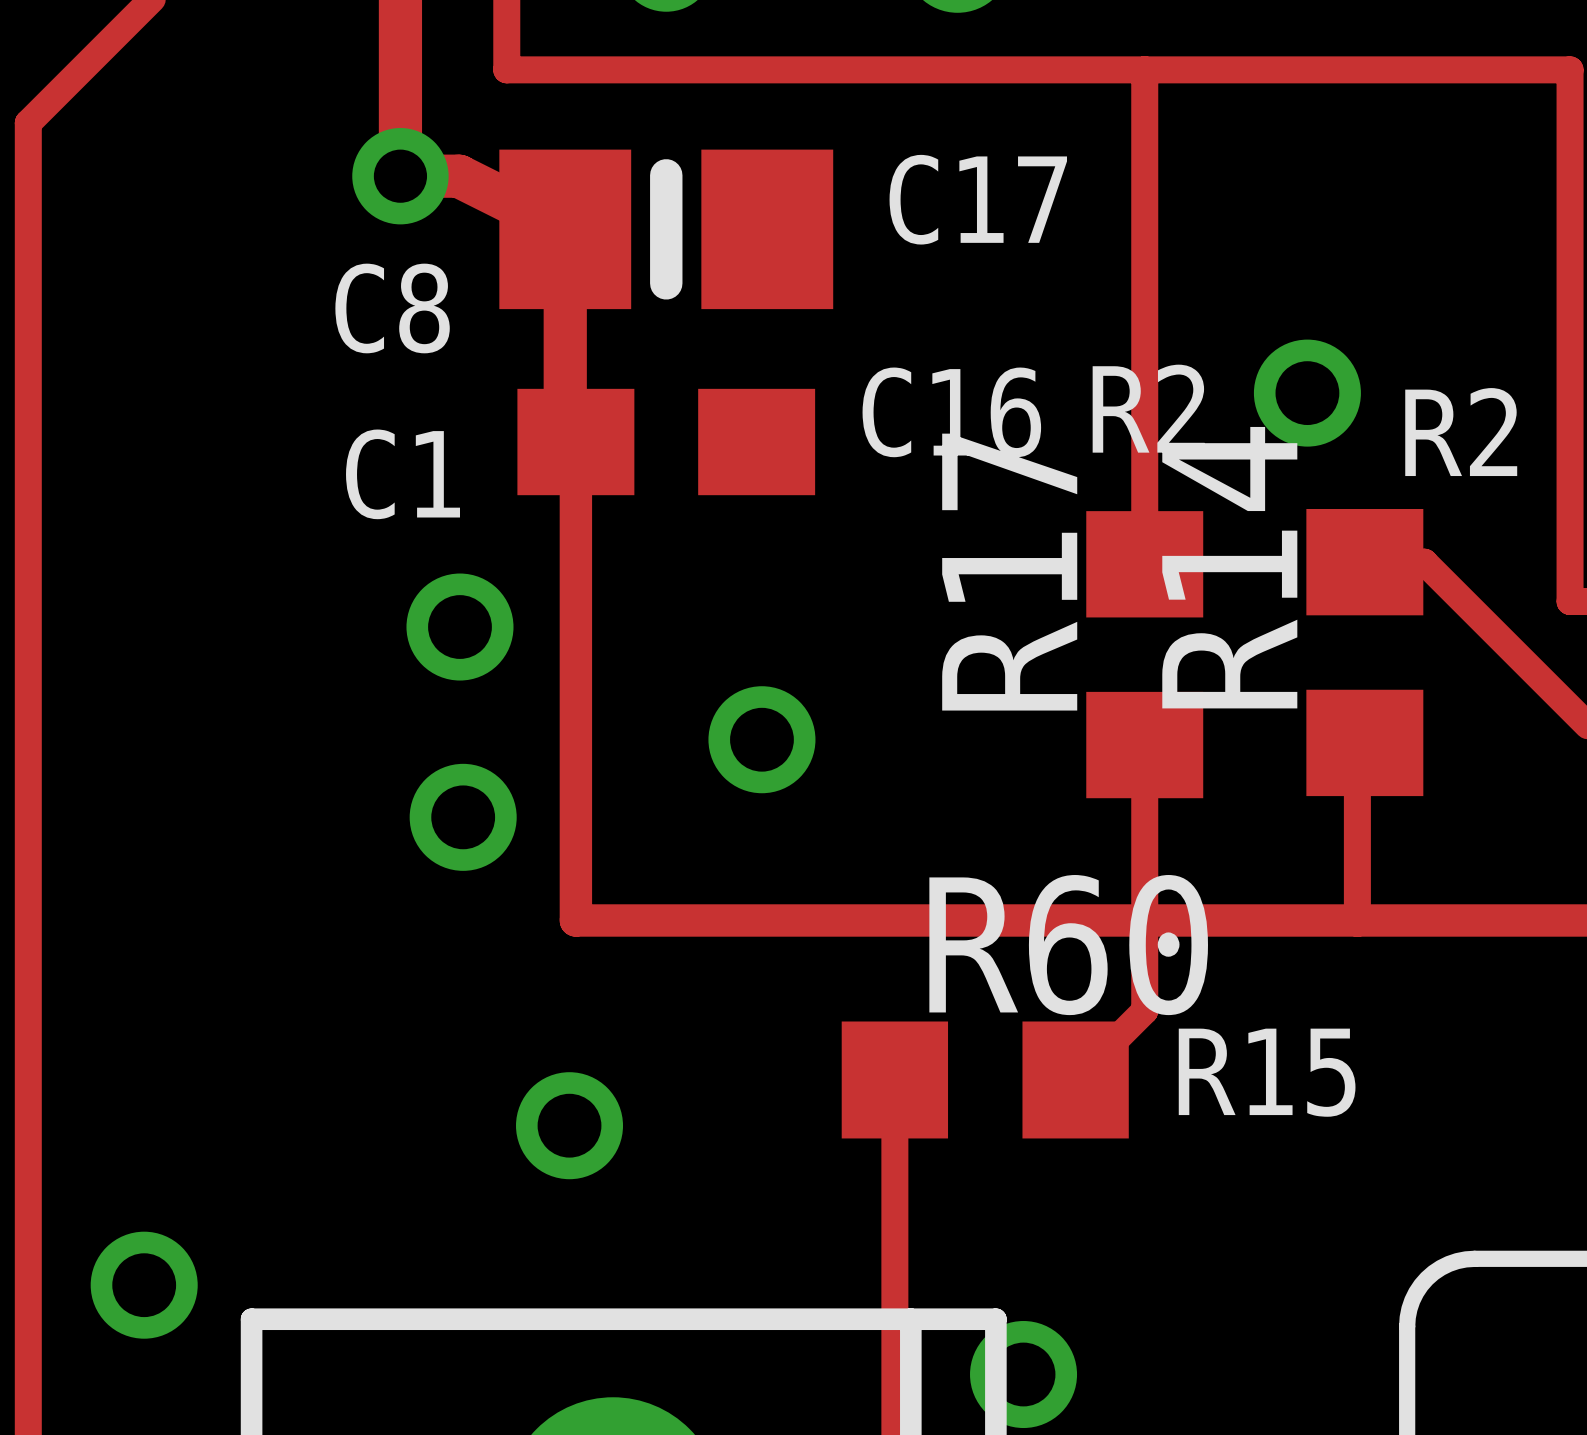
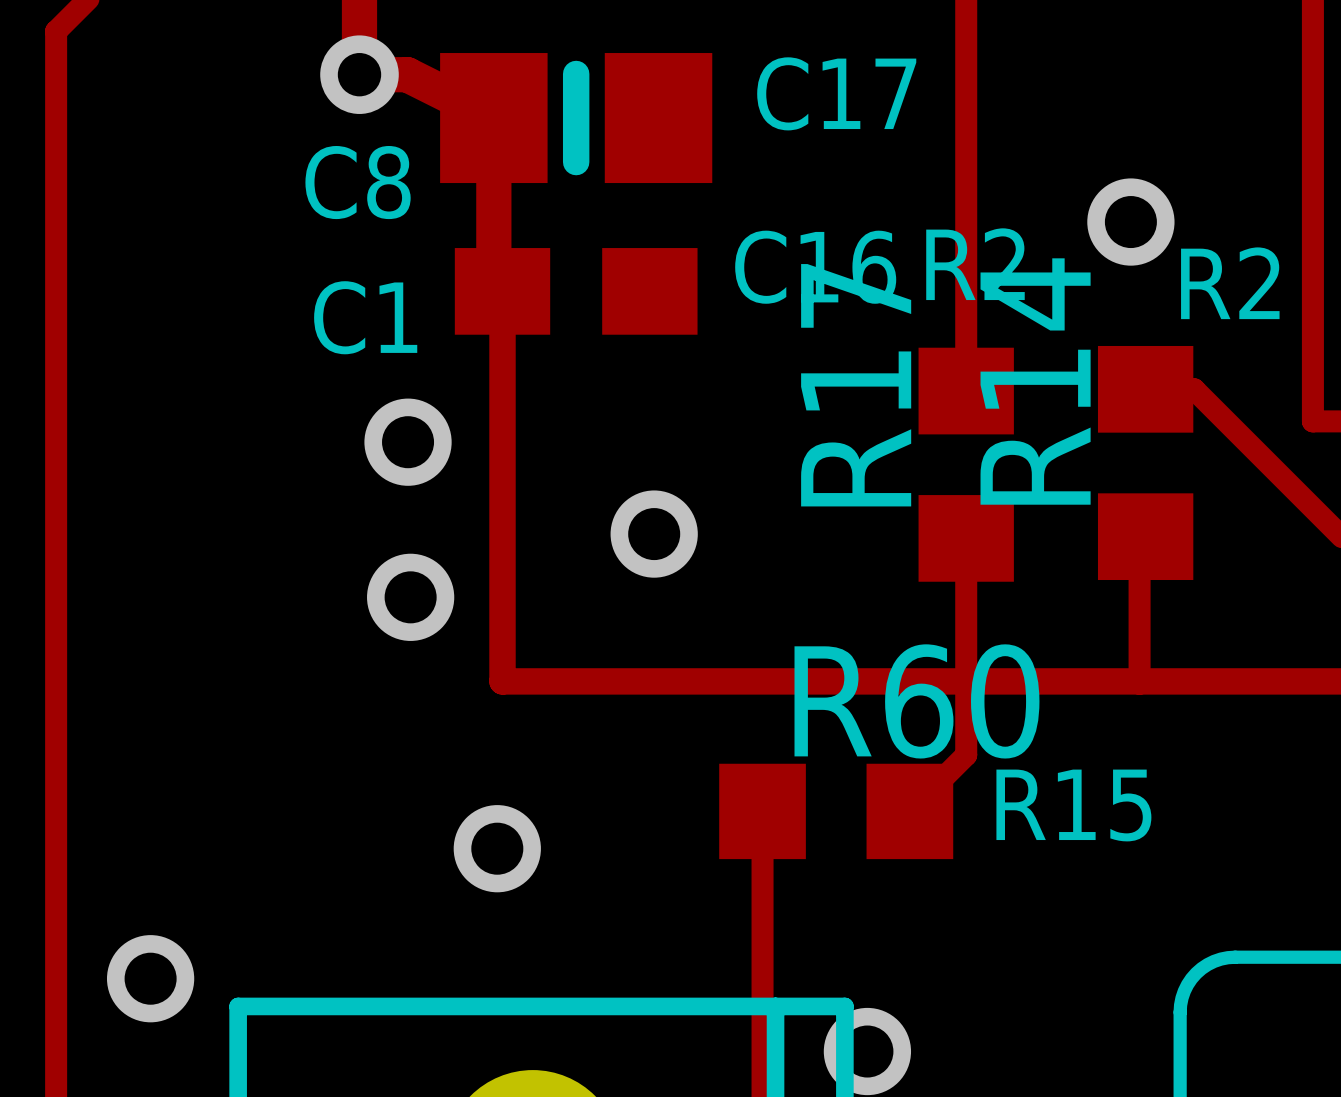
via position: (1307, 393) -> (1130, 222)

